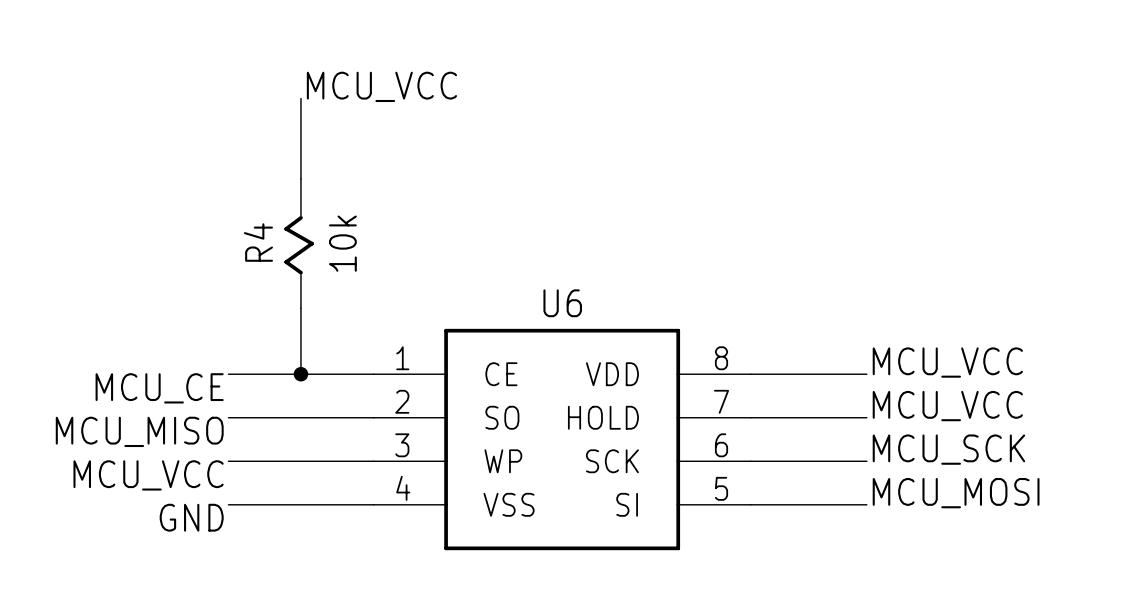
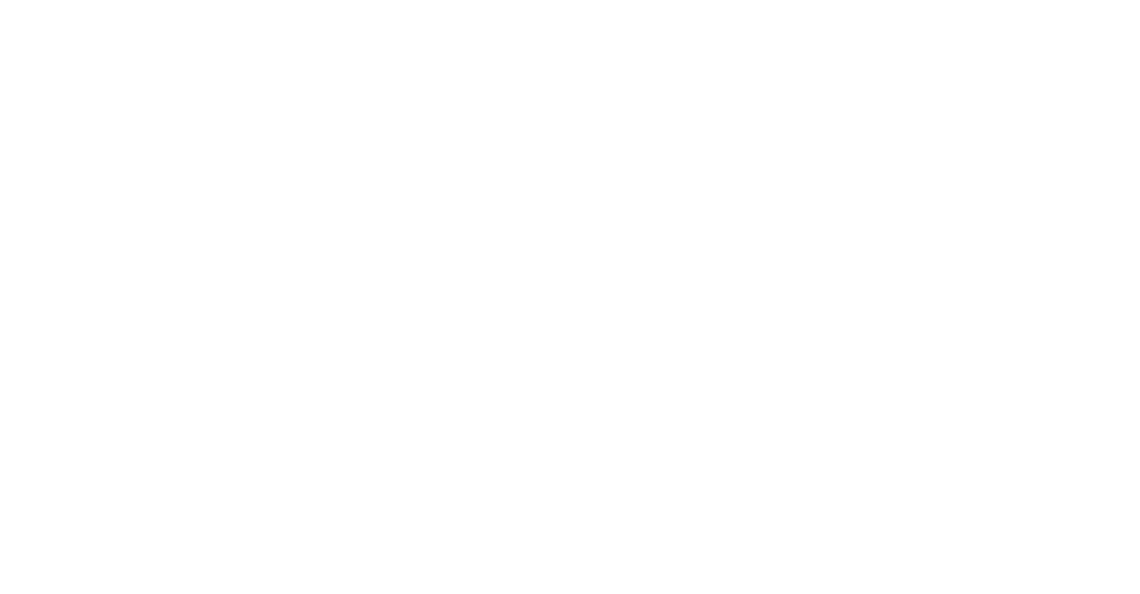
label: MCU_VCC (381, 86) -> none
wire: (300, 98) (300, 178) -> none
R4: 10k (299, 243) -> none
wire: (300, 308) (300, 374) -> none
label: MCU_VCC (947, 362) -> none
wire: (228, 374) (373, 374) -> none
junction: (300, 374) -> none
wire: (750, 374) (866, 374) -> none
label: MCU_CE (159, 388) -> none
label: MCU_VCC (947, 406) -> none
wire: (228, 417) (373, 417) -> none
wire: (750, 417) (866, 417) -> none
label: MCU_MISO (139, 431) -> none
U6: (562, 439) -> none
label: MCU_SCK (948, 449) -> none
wire: (228, 461) (373, 461) -> none
wire: (750, 461) (866, 461) -> none
label: MCU_VCC (148, 475) -> none
label: MCU_MOSI (956, 493) -> none
wire: (228, 504) (373, 504) -> none
wire: (750, 504) (866, 504) -> none
label: GND (191, 517) -> none

